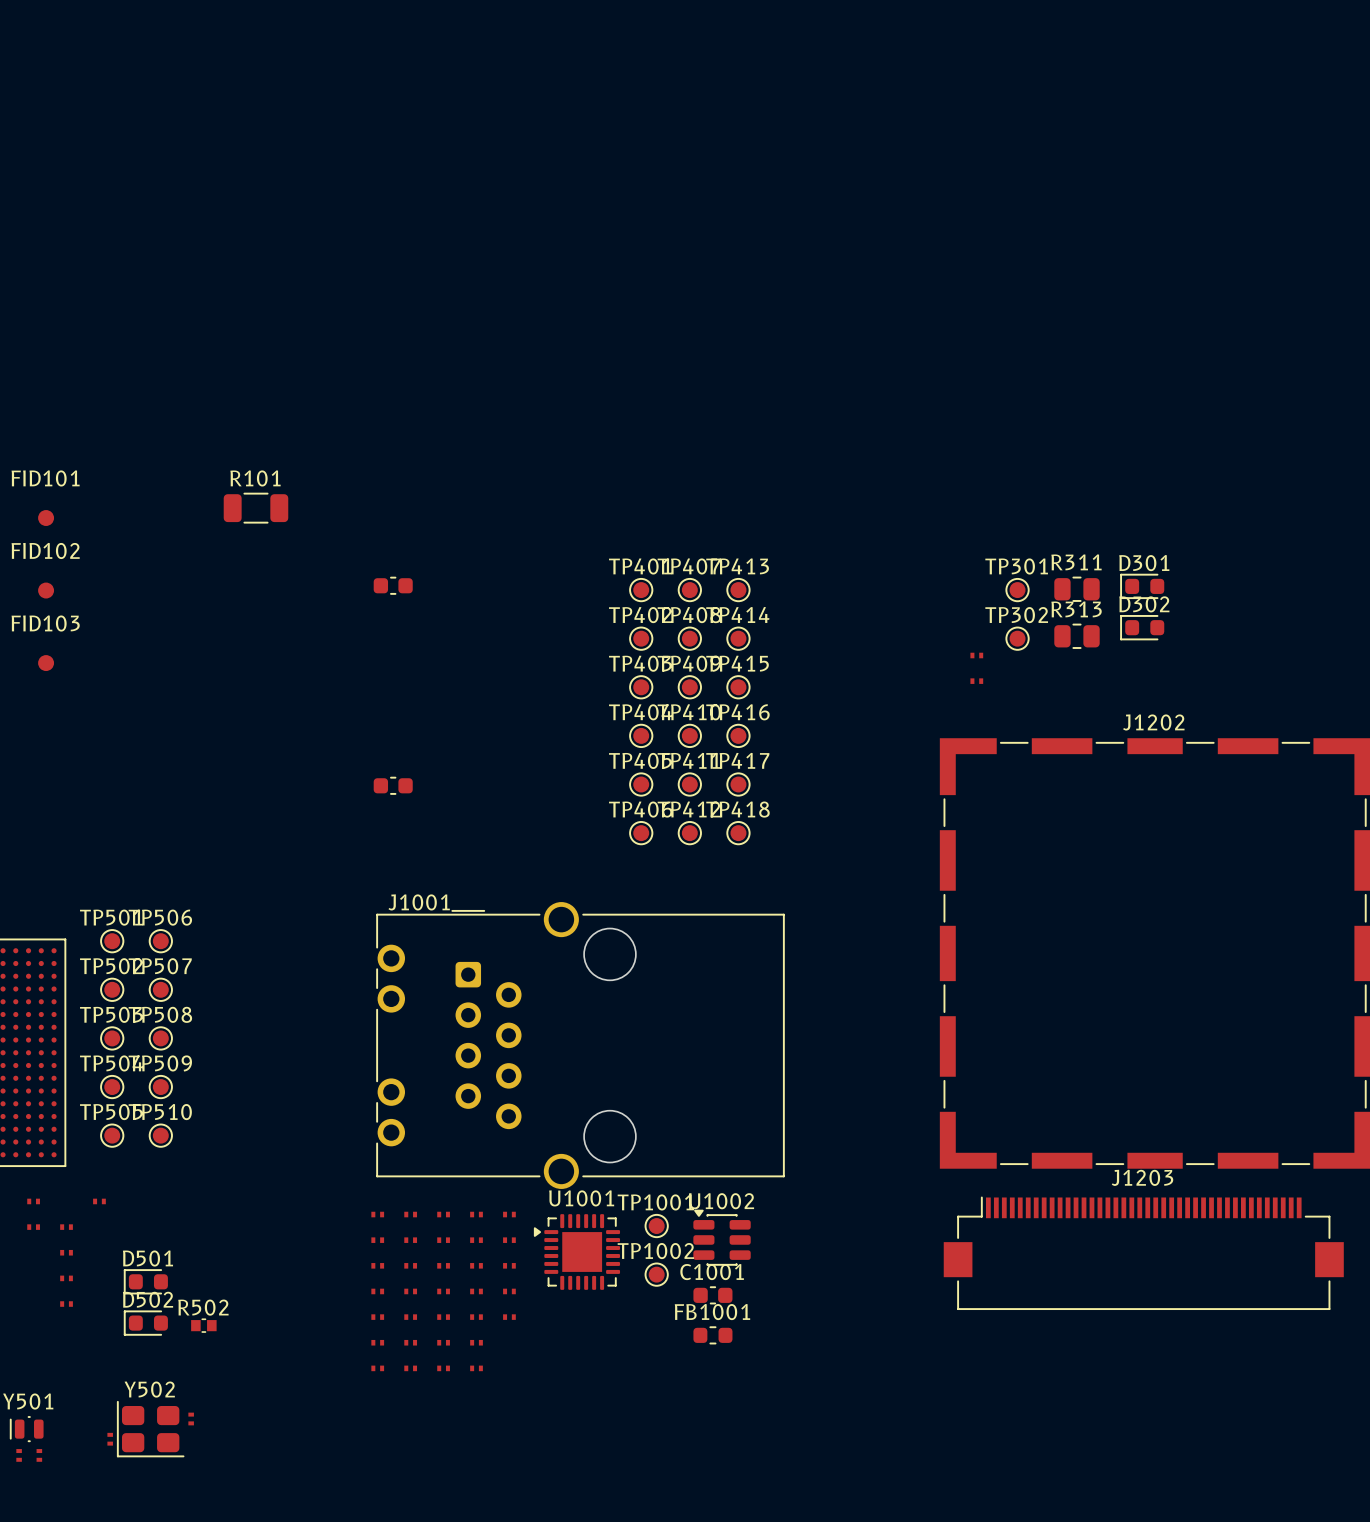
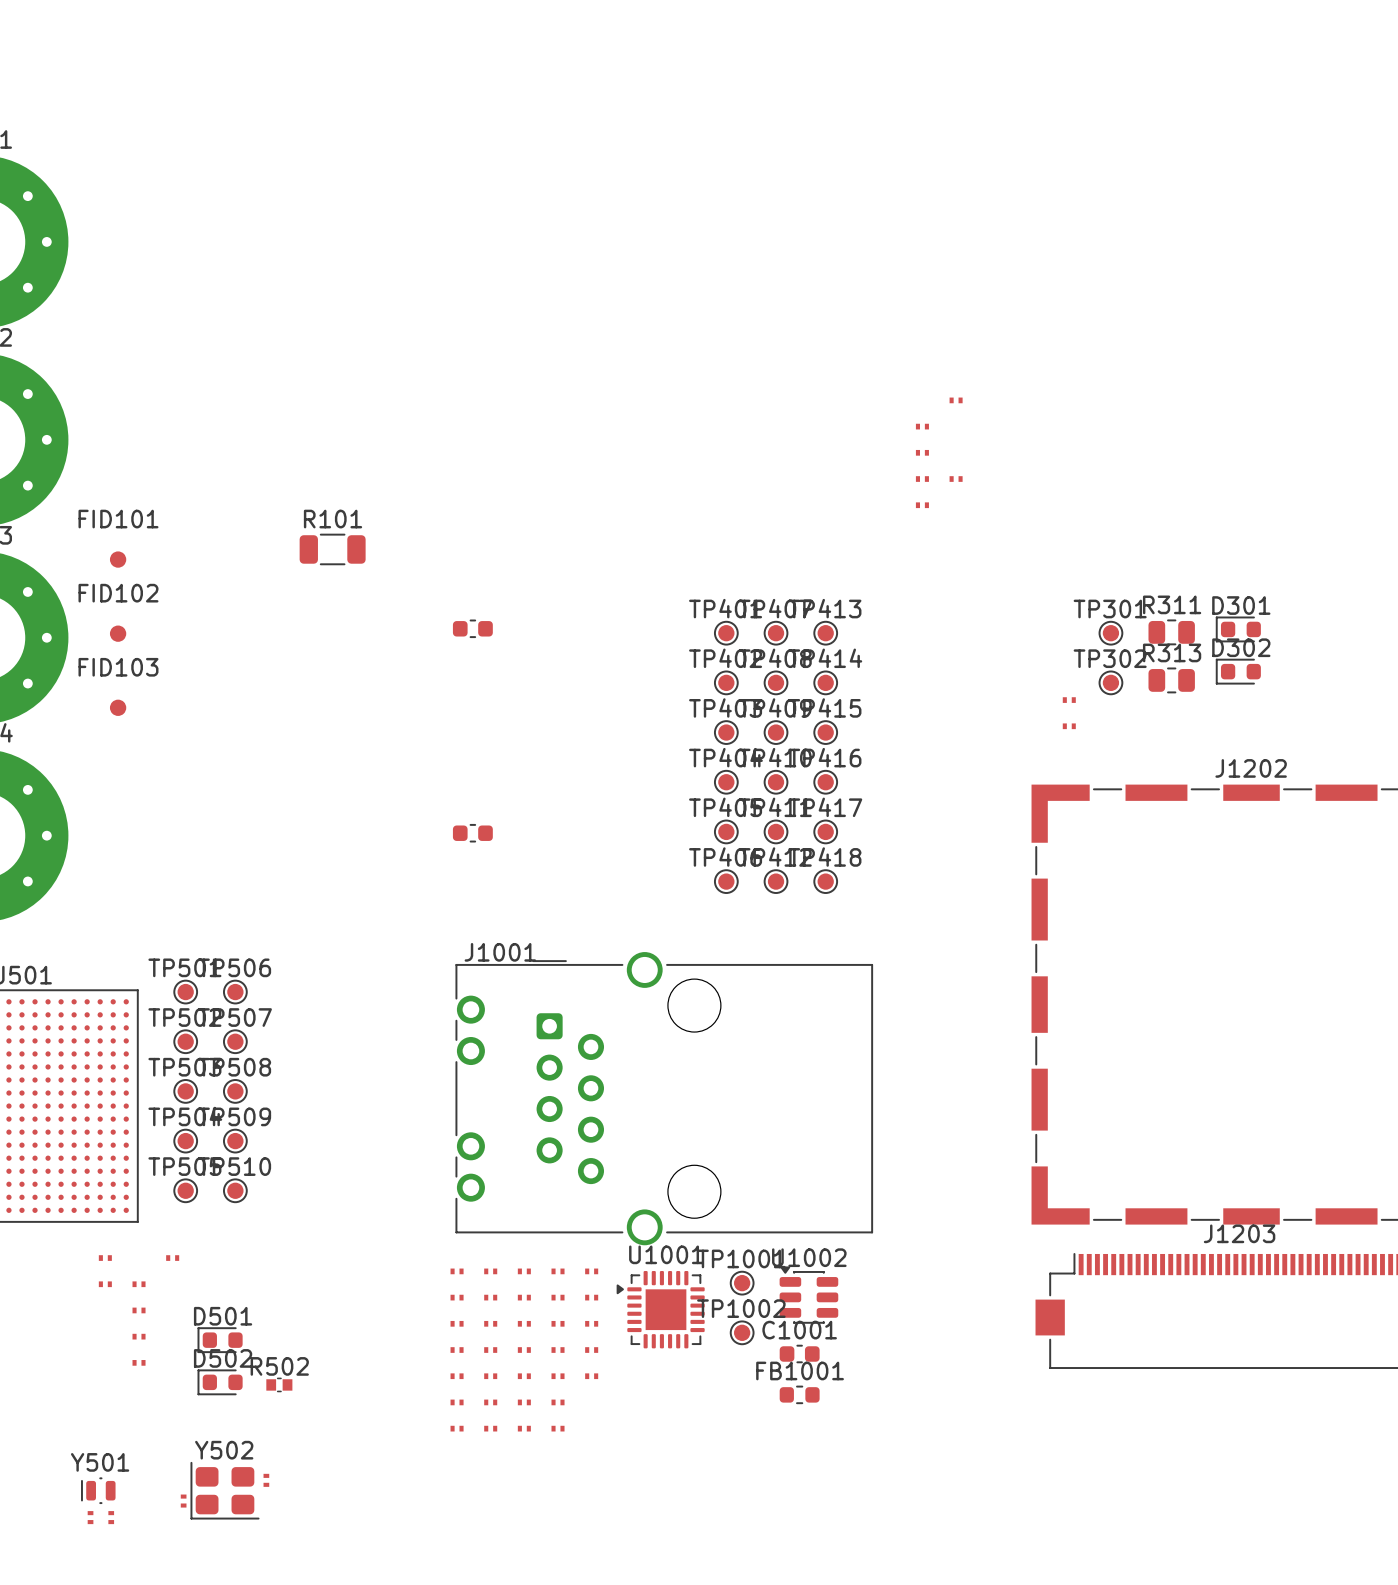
part: none -> (956, 400)
part: none -> (922, 426)
part: none -> (922, 452)
part: none -> (922, 479)
part: none -> (956, 479)
part: none -> (922, 505)

